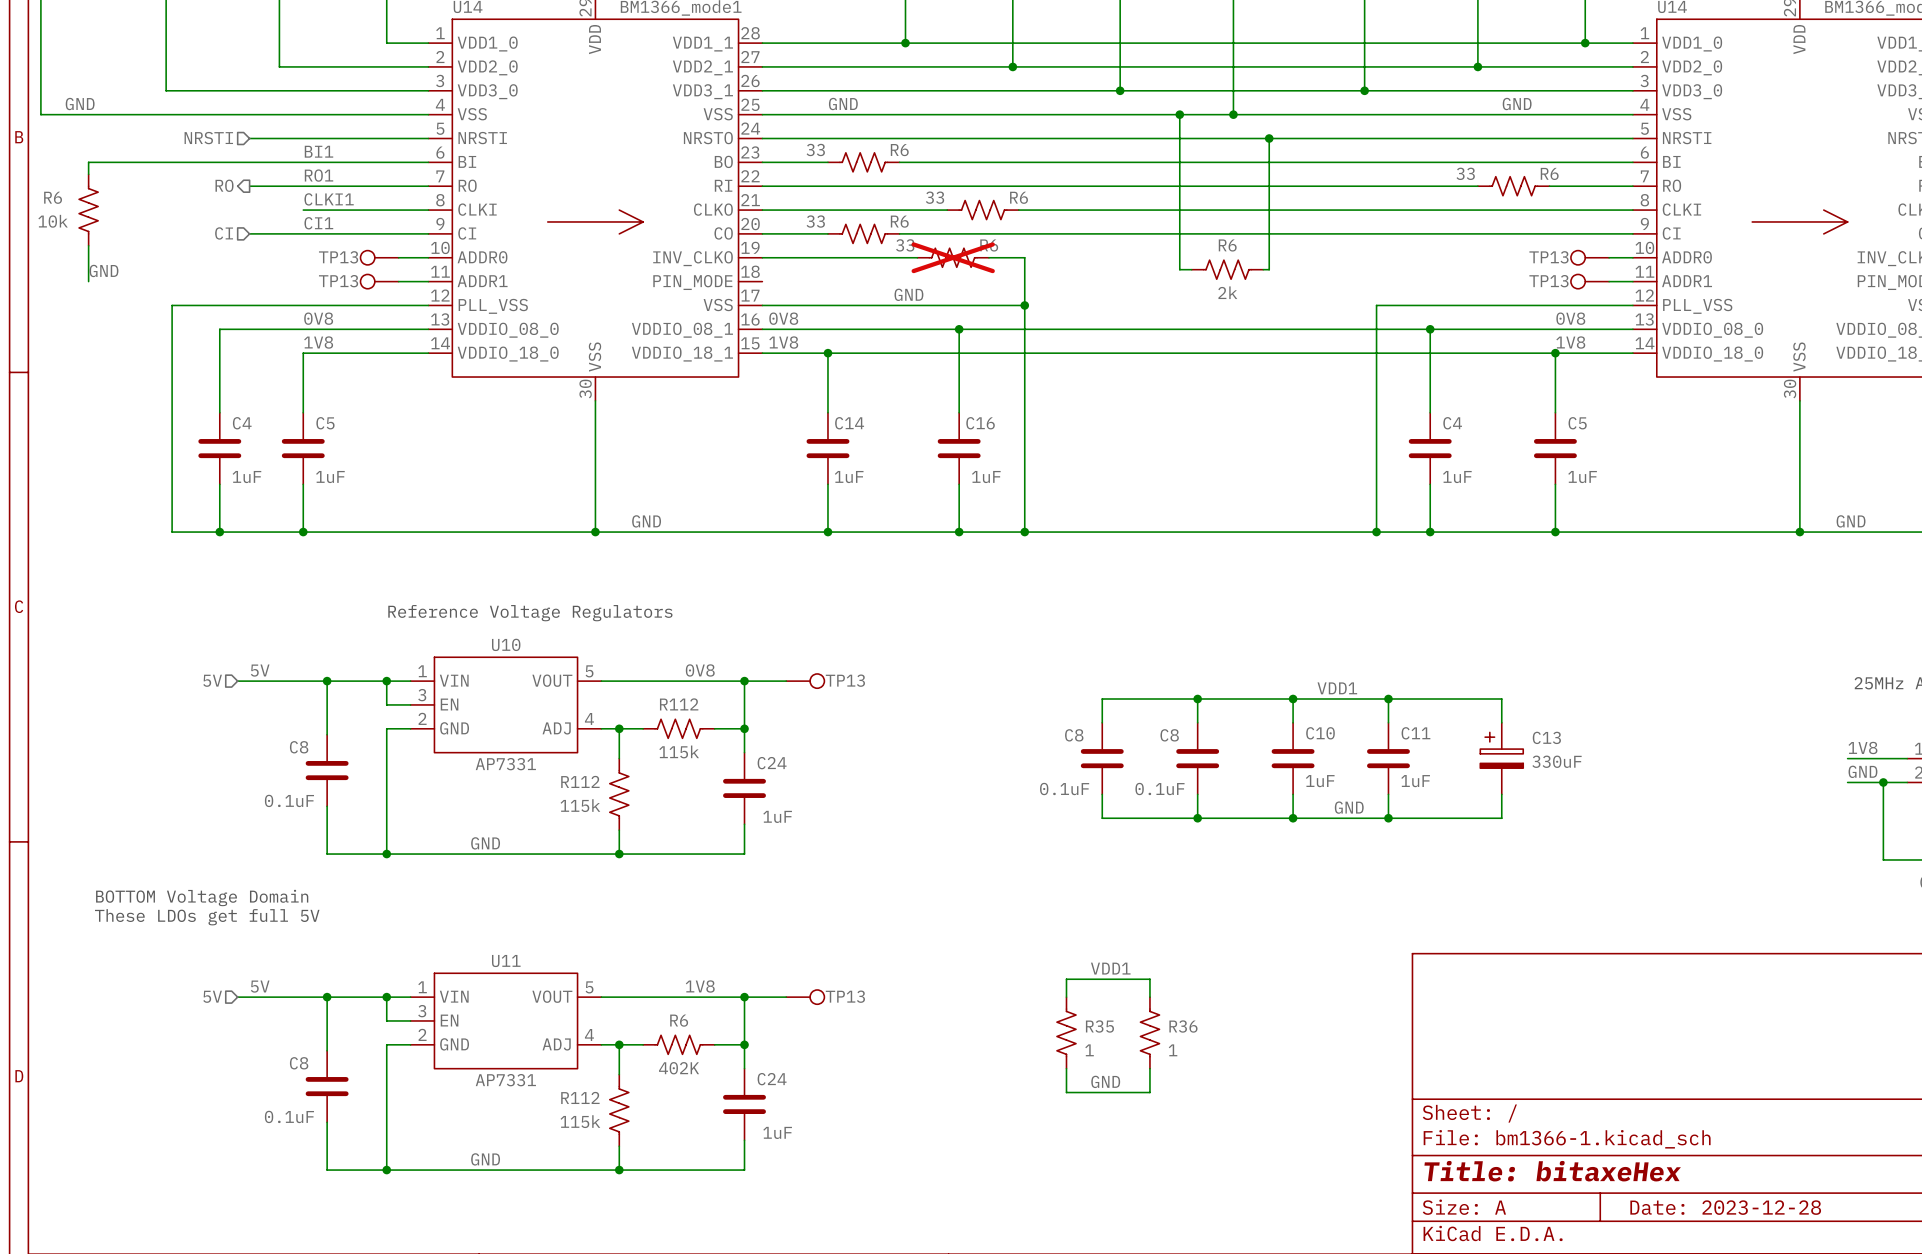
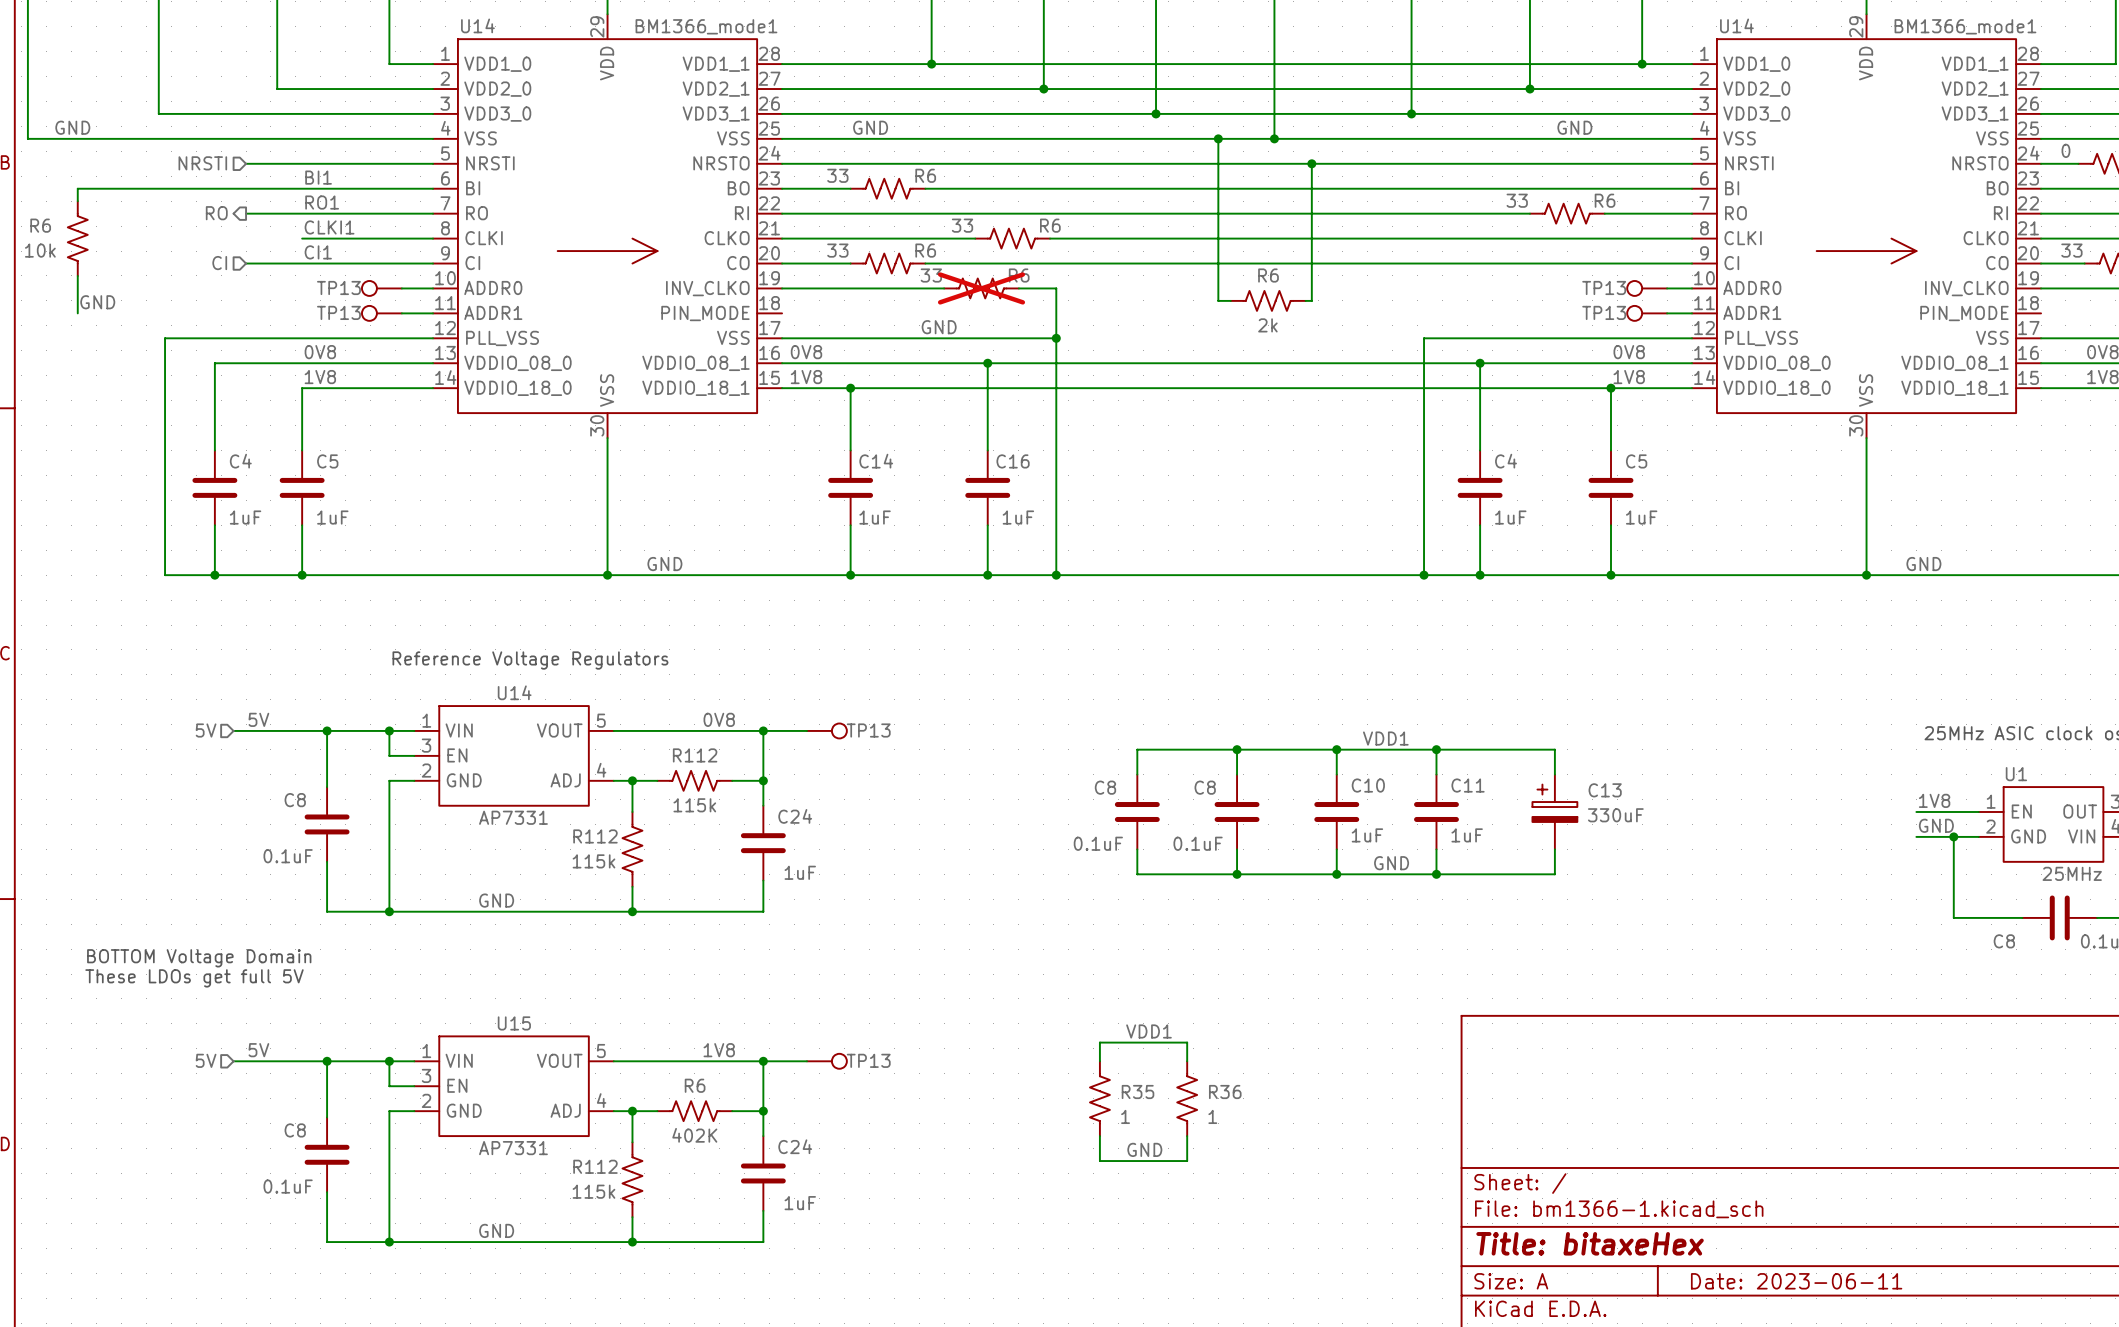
U10 name: U10 (506, 644) -> U14 (514, 692)
U11 name: U11 (506, 961) -> U15 (514, 1023)
title block: Date: 2023-12-28 (1725, 1207) -> Date: 2023-06-11 (1796, 1281)

